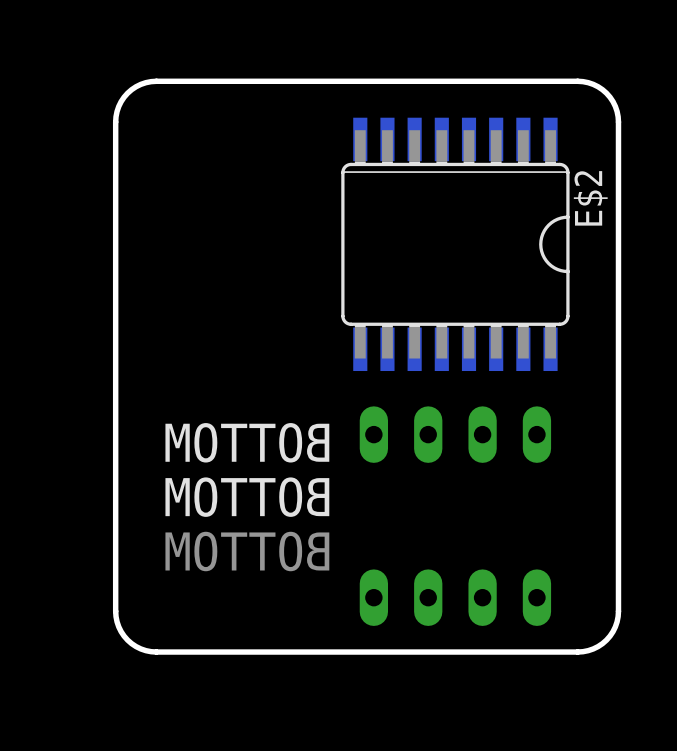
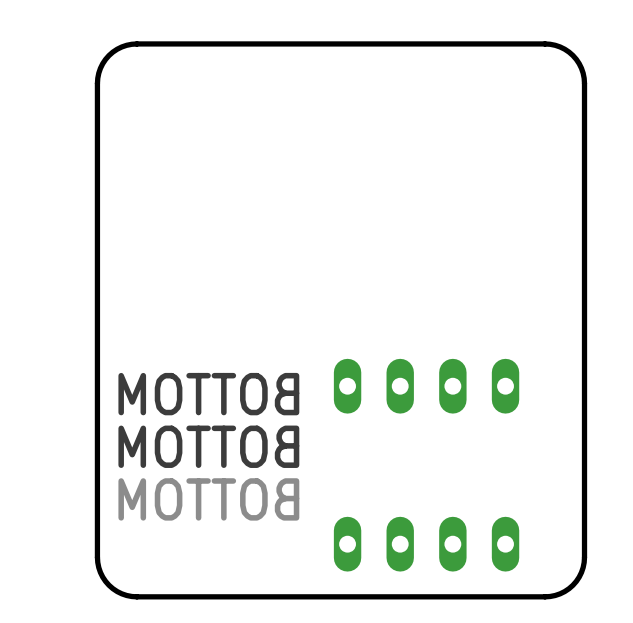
E$2: (455, 244) -> none

